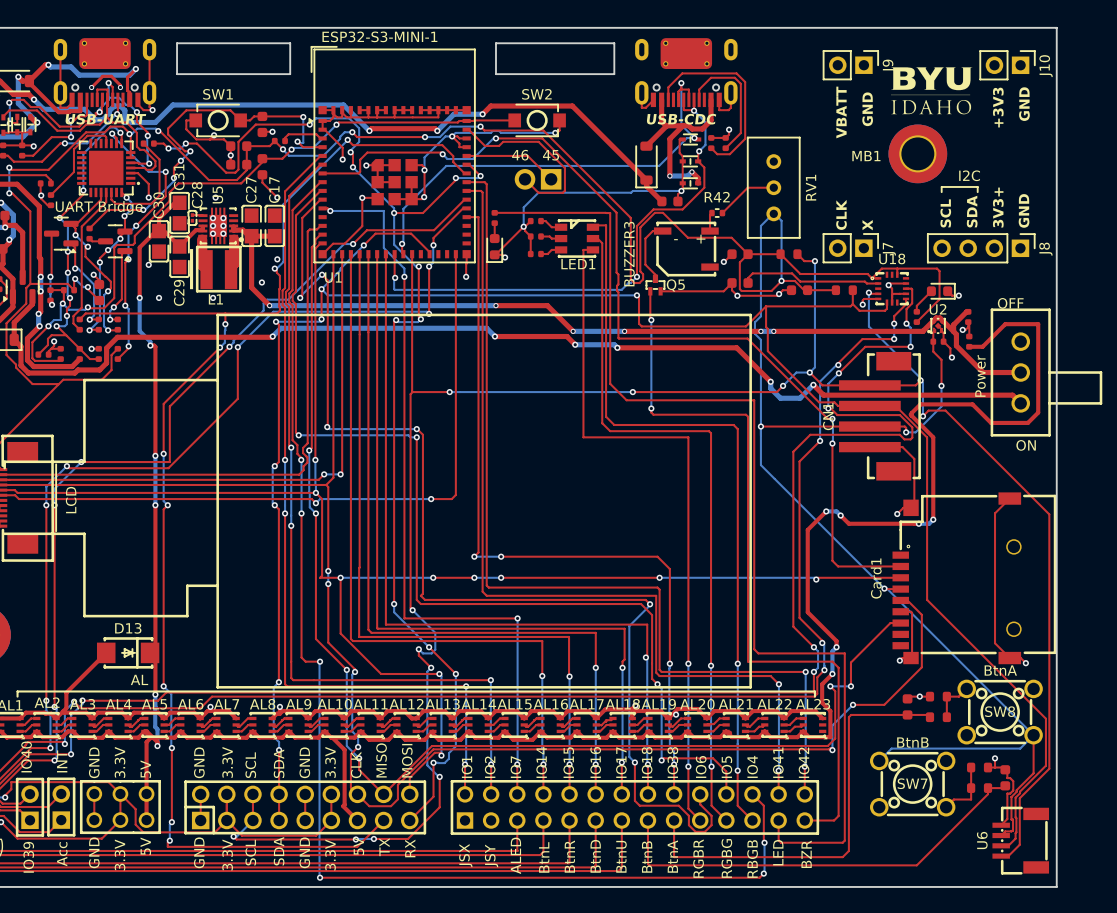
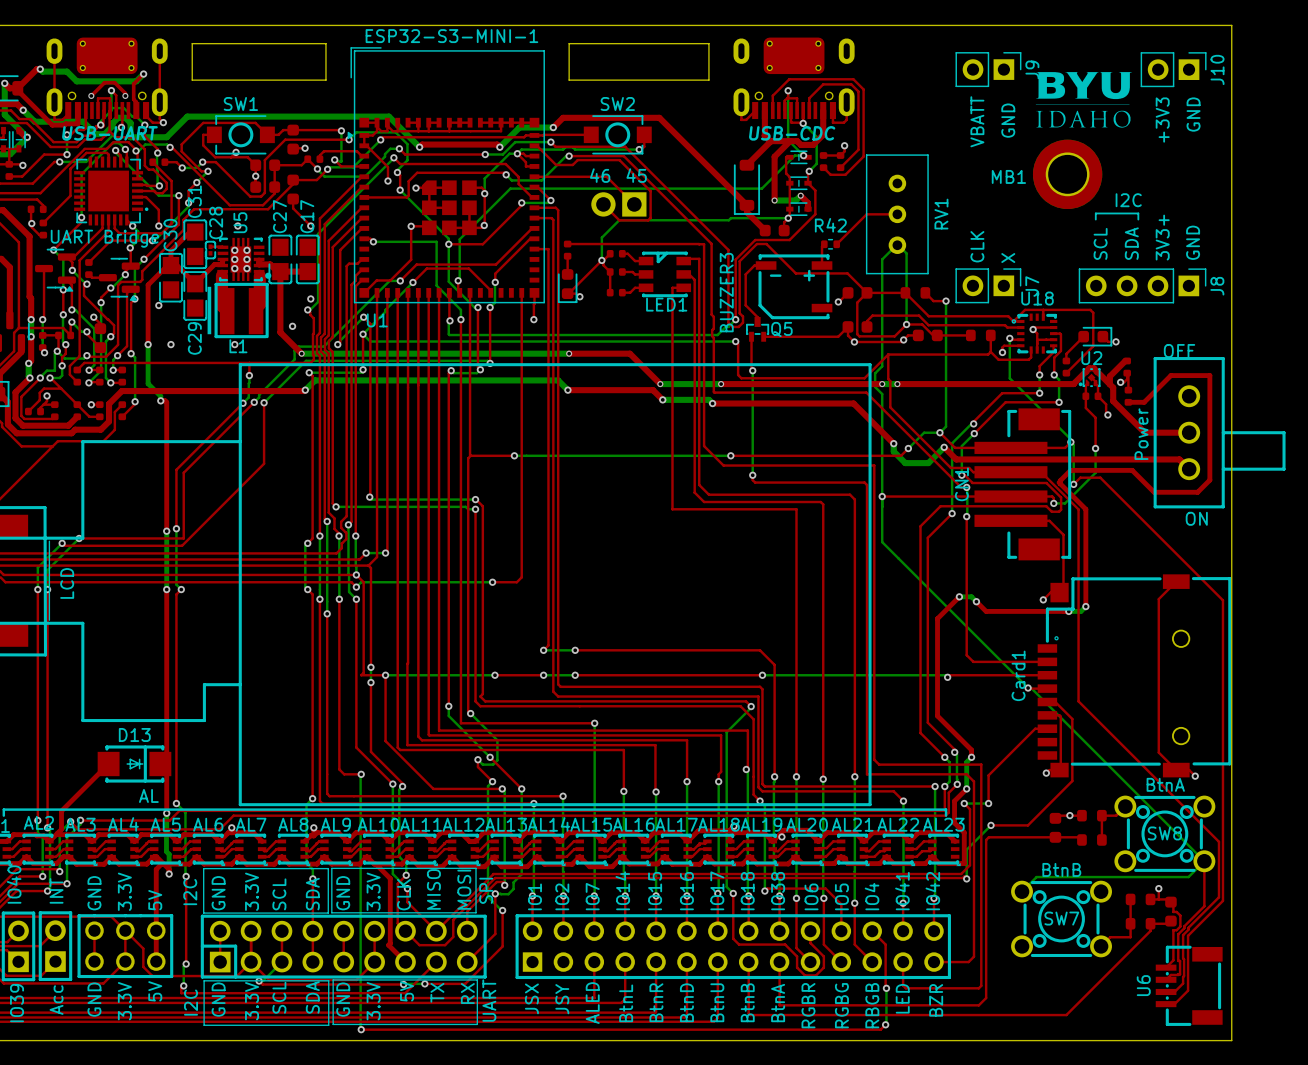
line: none -> (203, 868) (328, 868) (328, 913) (203, 913) (203, 868)
line: none -> (331, 868) (476, 868) (476, 912) (331, 912) (331, 868)
text: none -> SPI (486, 890)
text: none -> I2C (190, 892)
line: none -> (333, 979) (477, 979) (477, 1024) (333, 1024) (333, 979)
line: none -> (204, 980) (328, 980) (328, 1025) (204, 1025) (204, 980)
text: none -> UART (489, 1000)
text: none -> I2C (191, 1002)

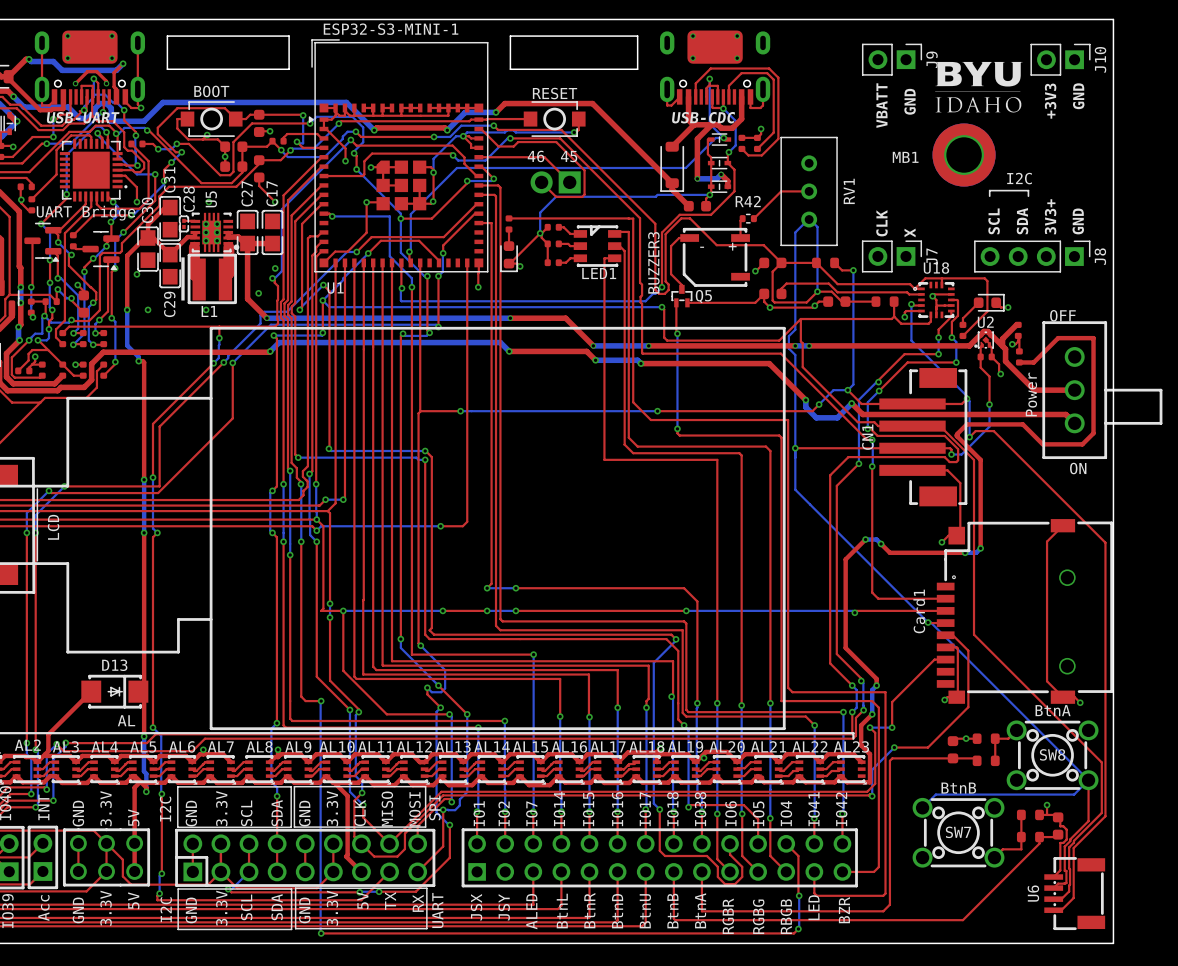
SW1 name: SW1 (240, 103) -> none
SW2 name: SW2 (617, 103) -> none
text: none -> BOOT (211, 91)
text: none -> RESET (555, 93)

